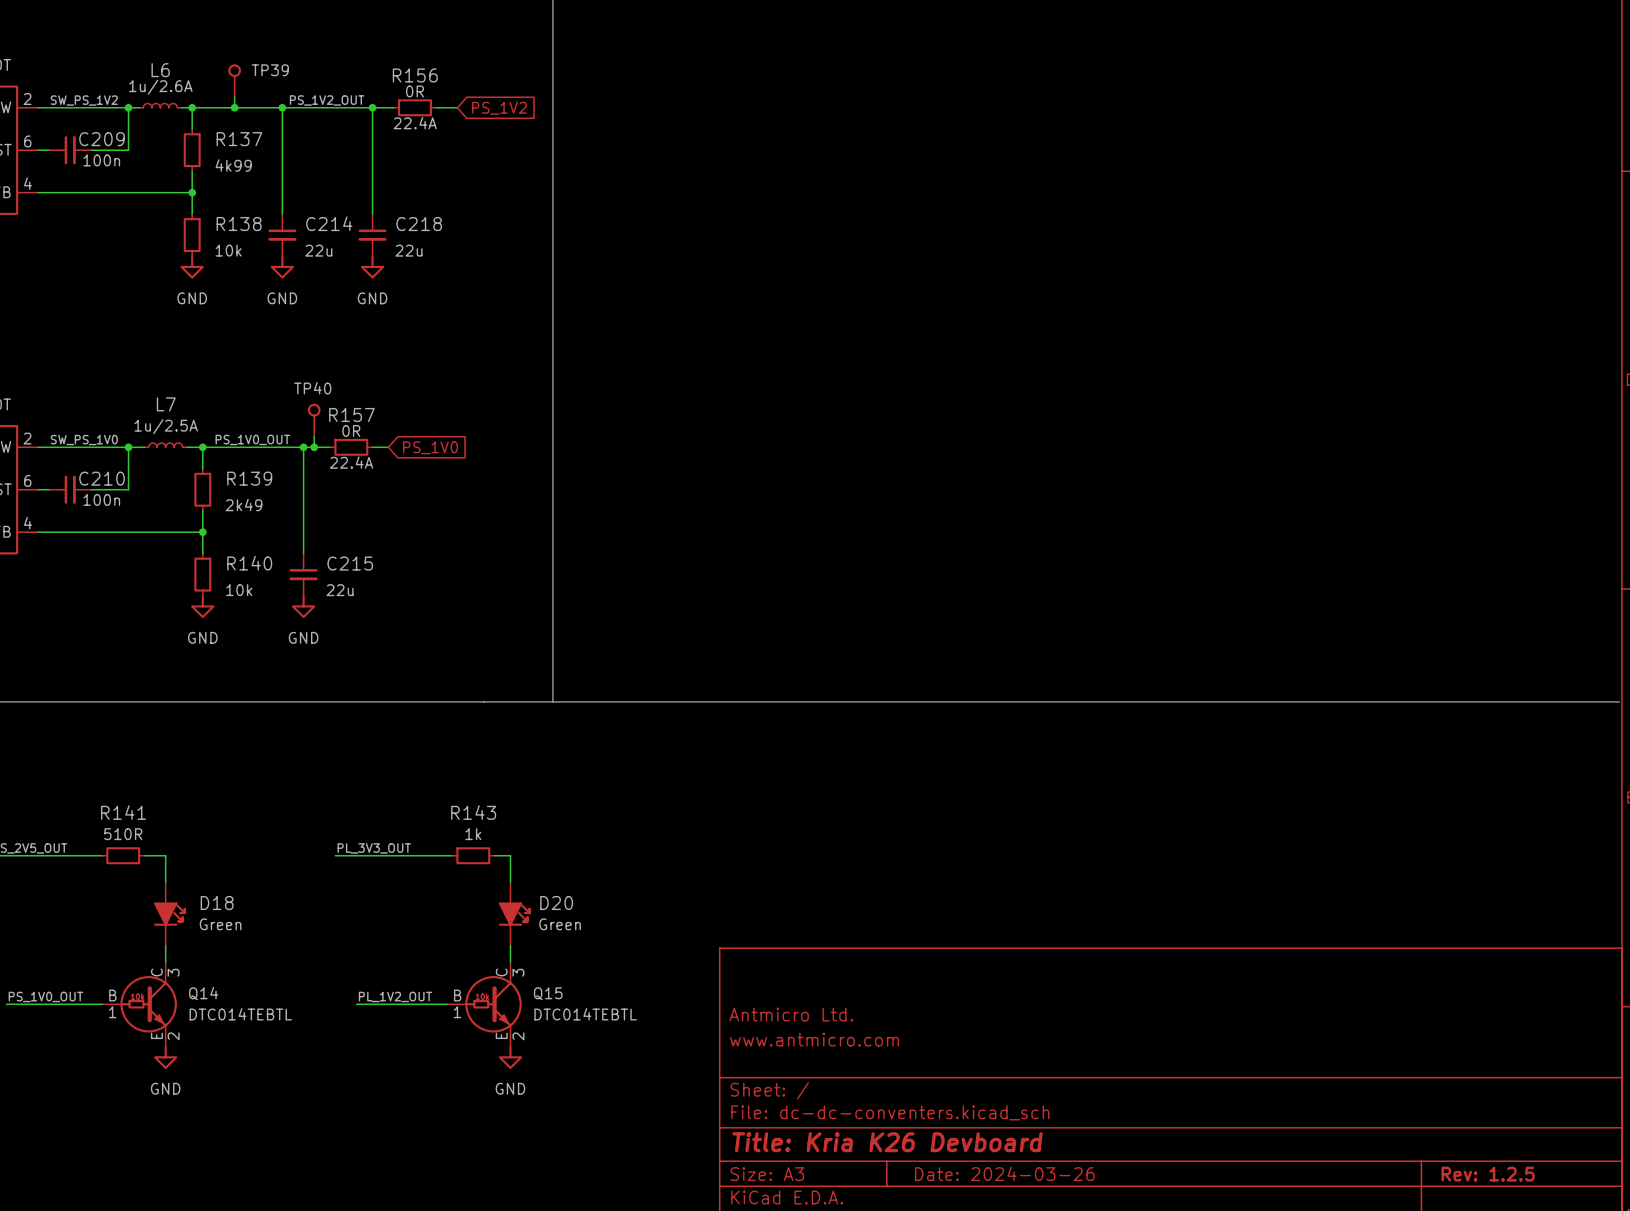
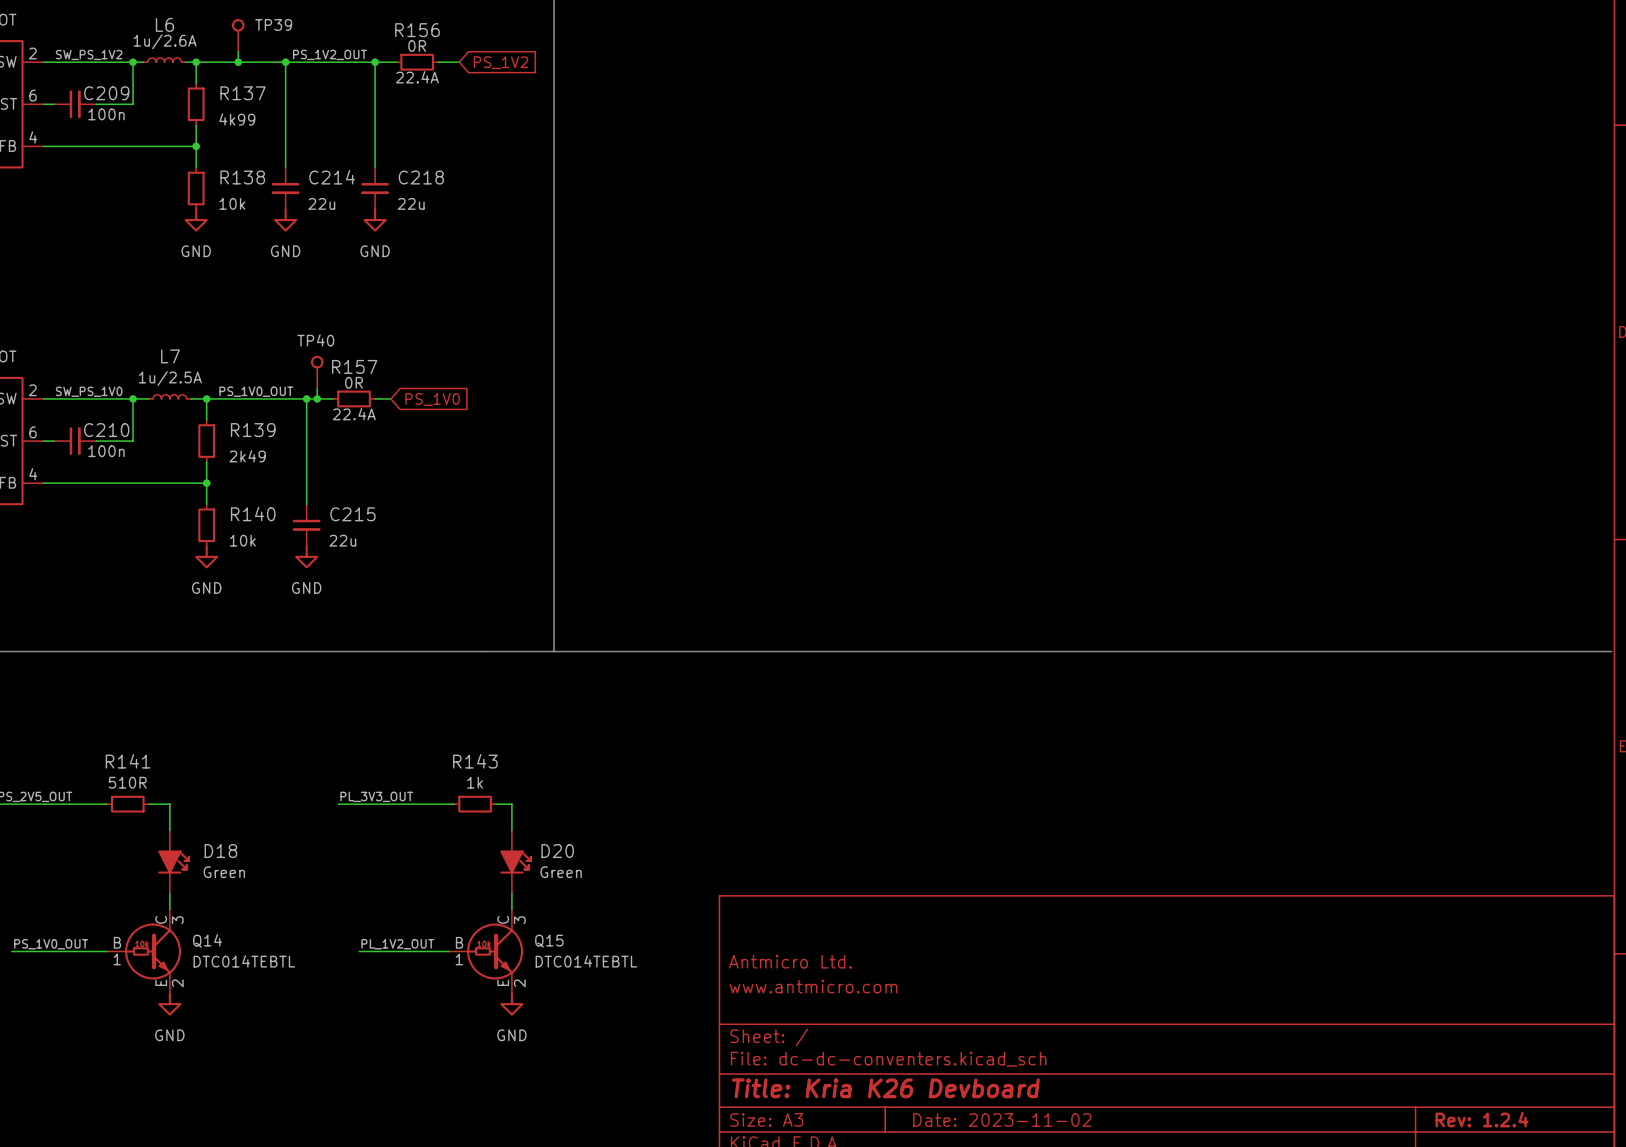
title block: Date: 2024-03-26 (1004, 1173) -> Date: 2023-11-02 (1002, 1119)
title block: Rev: 1.2.5 (1488, 1174) -> Rev: 1.2.4 (1482, 1119)

